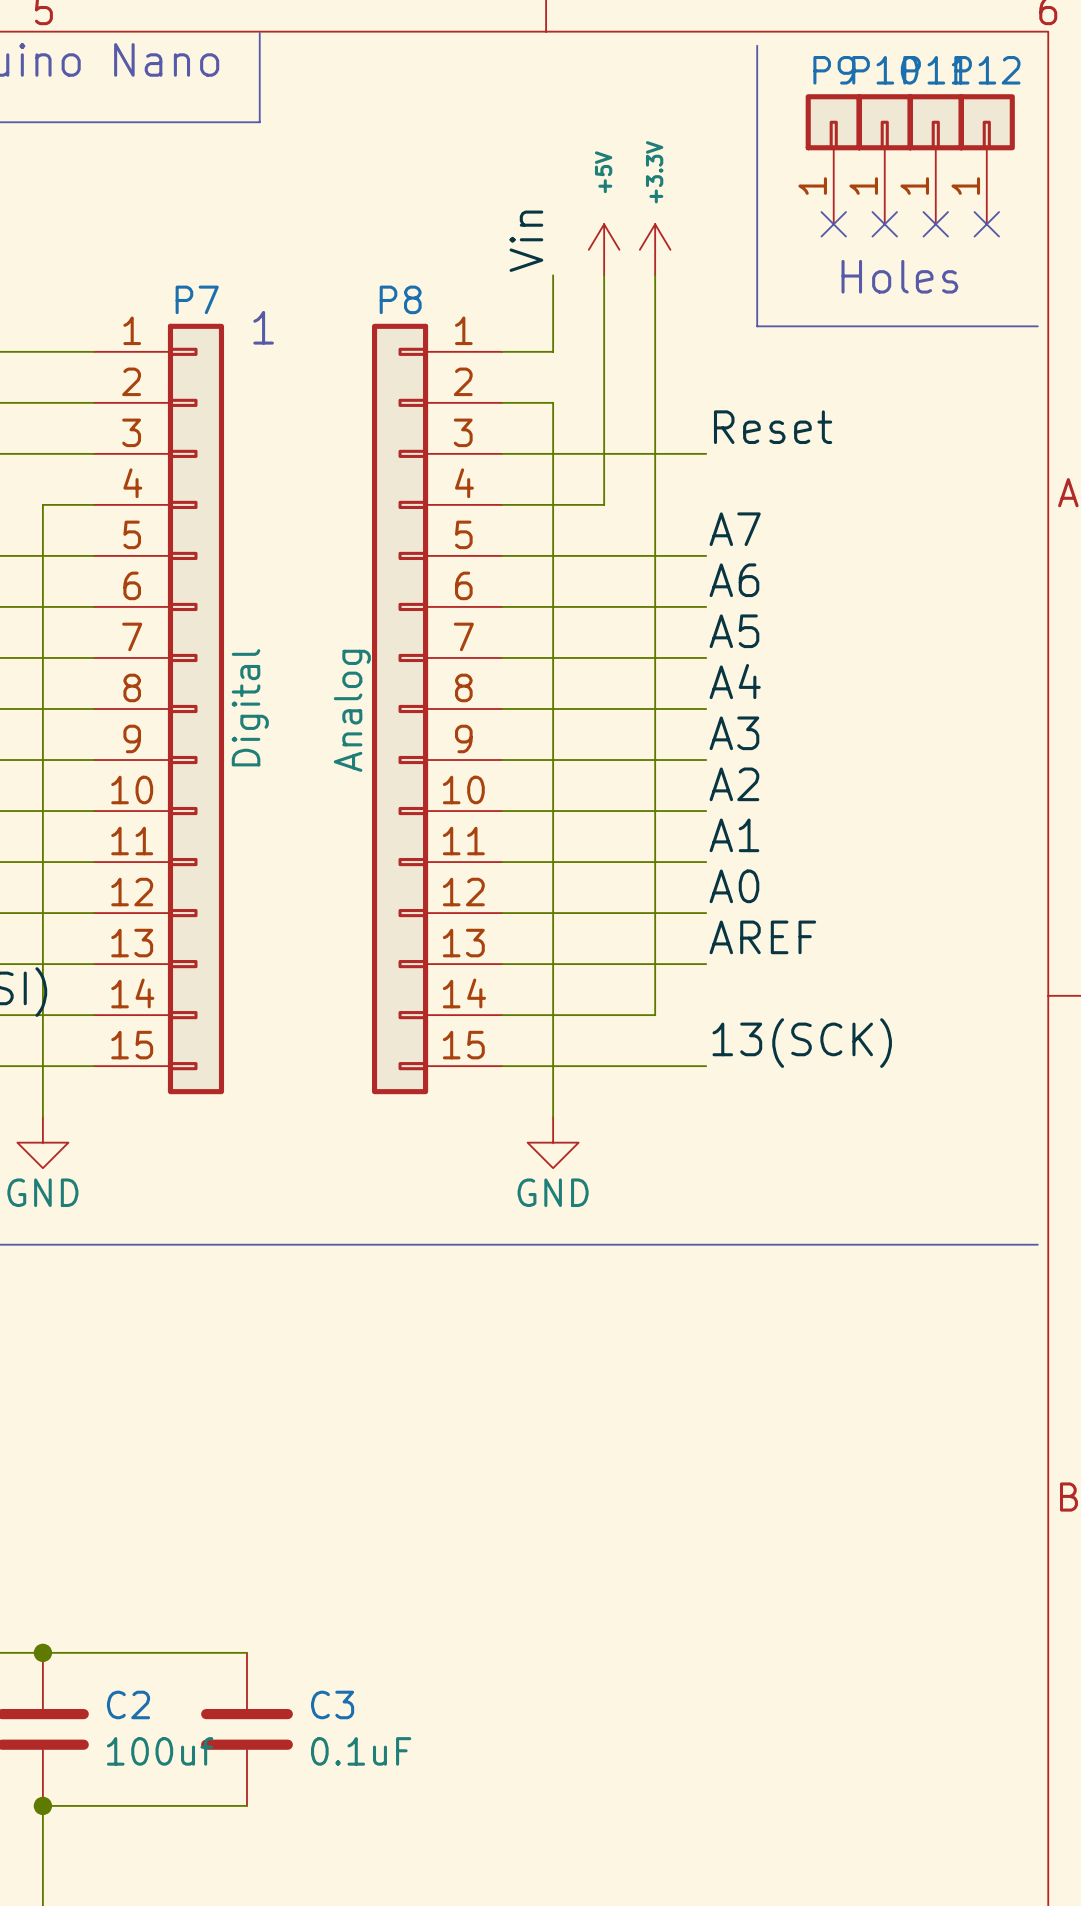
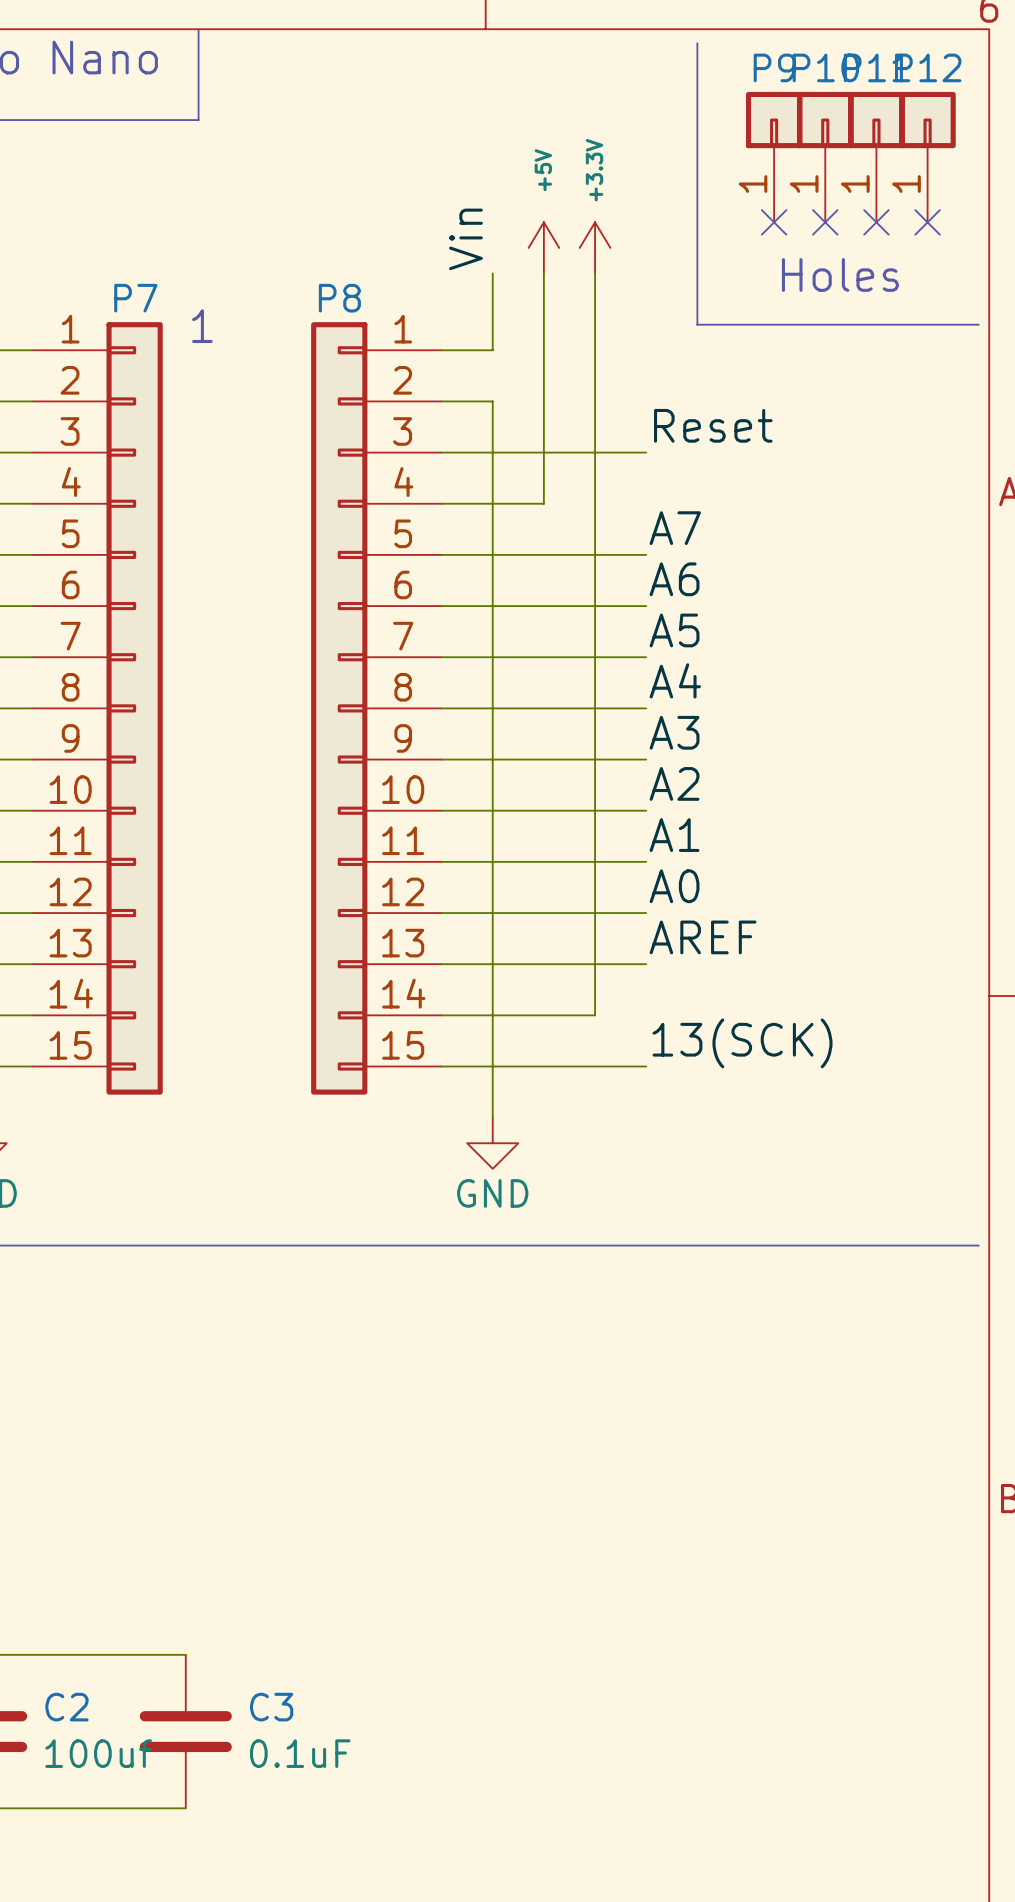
P7 value: Digital (250, 707) -> none
P8 value: Analog (352, 710) -> none

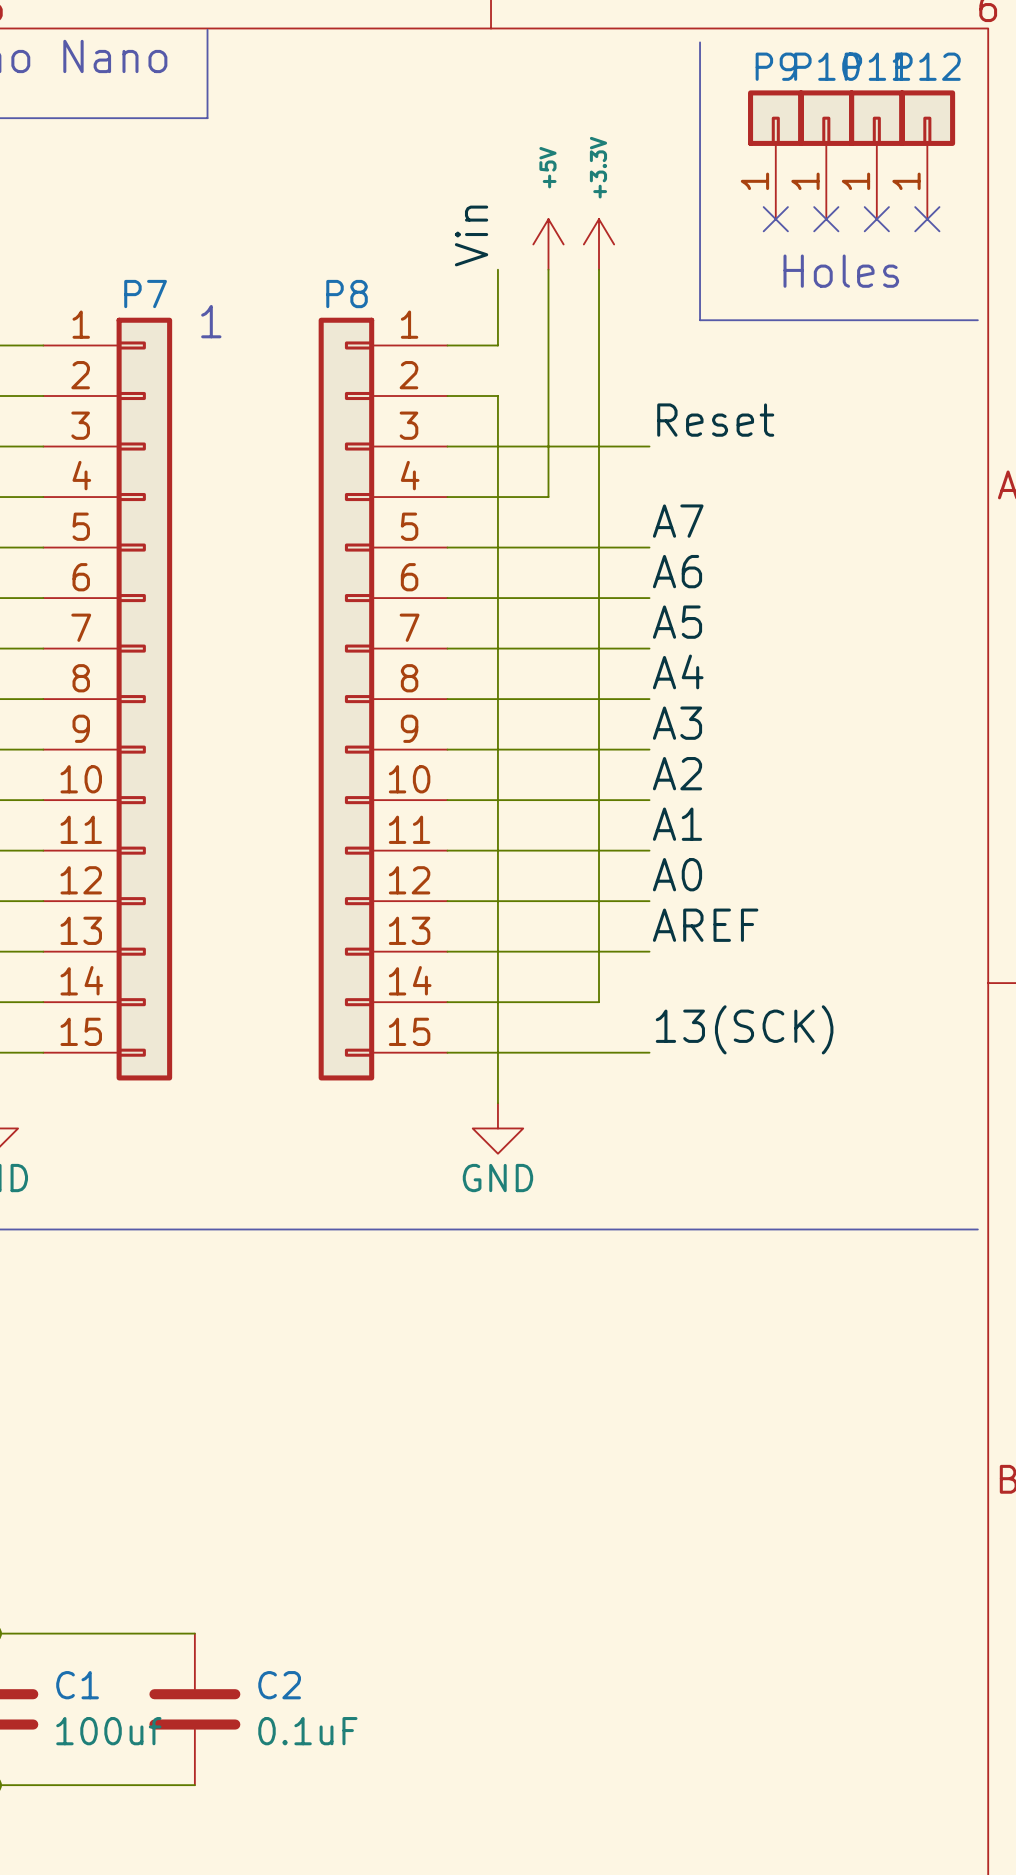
C2 name: C2 (66, 1707) -> C1 (77, 1685)
C3 name: C3 (271, 1707) -> C2 (279, 1685)

